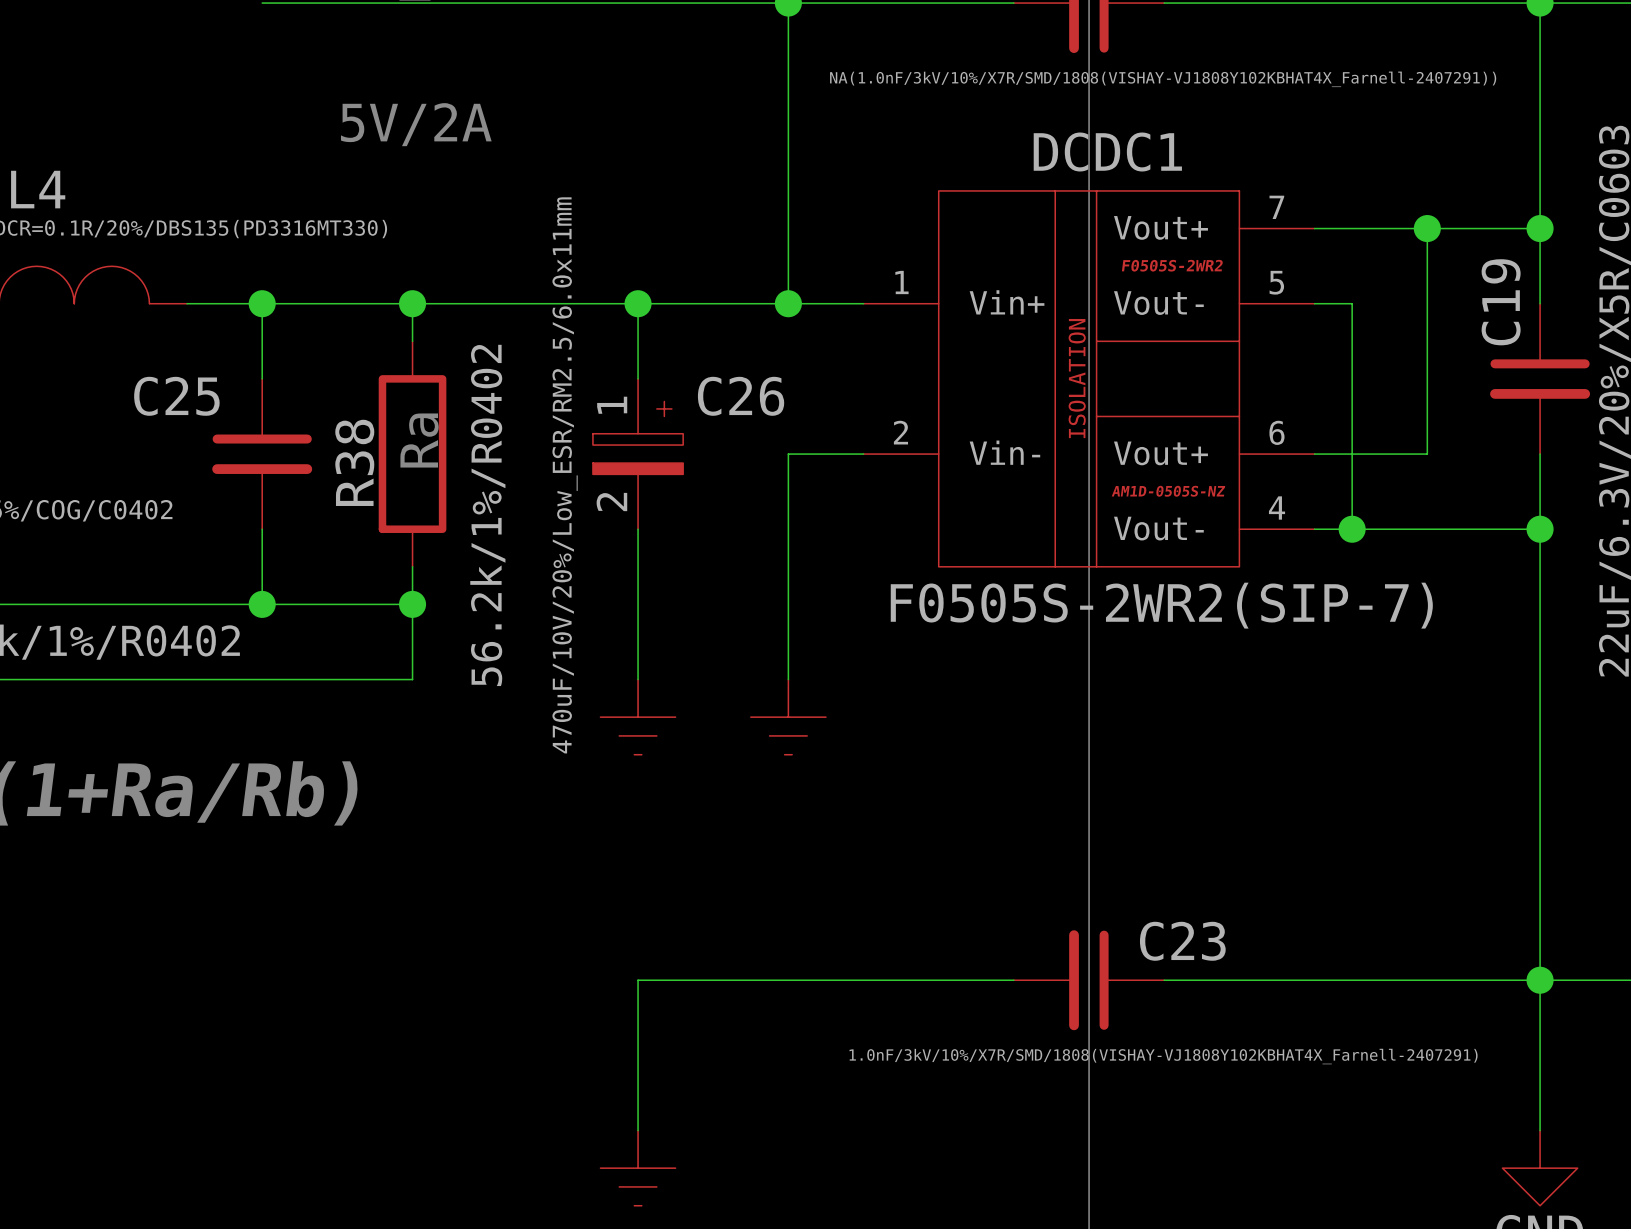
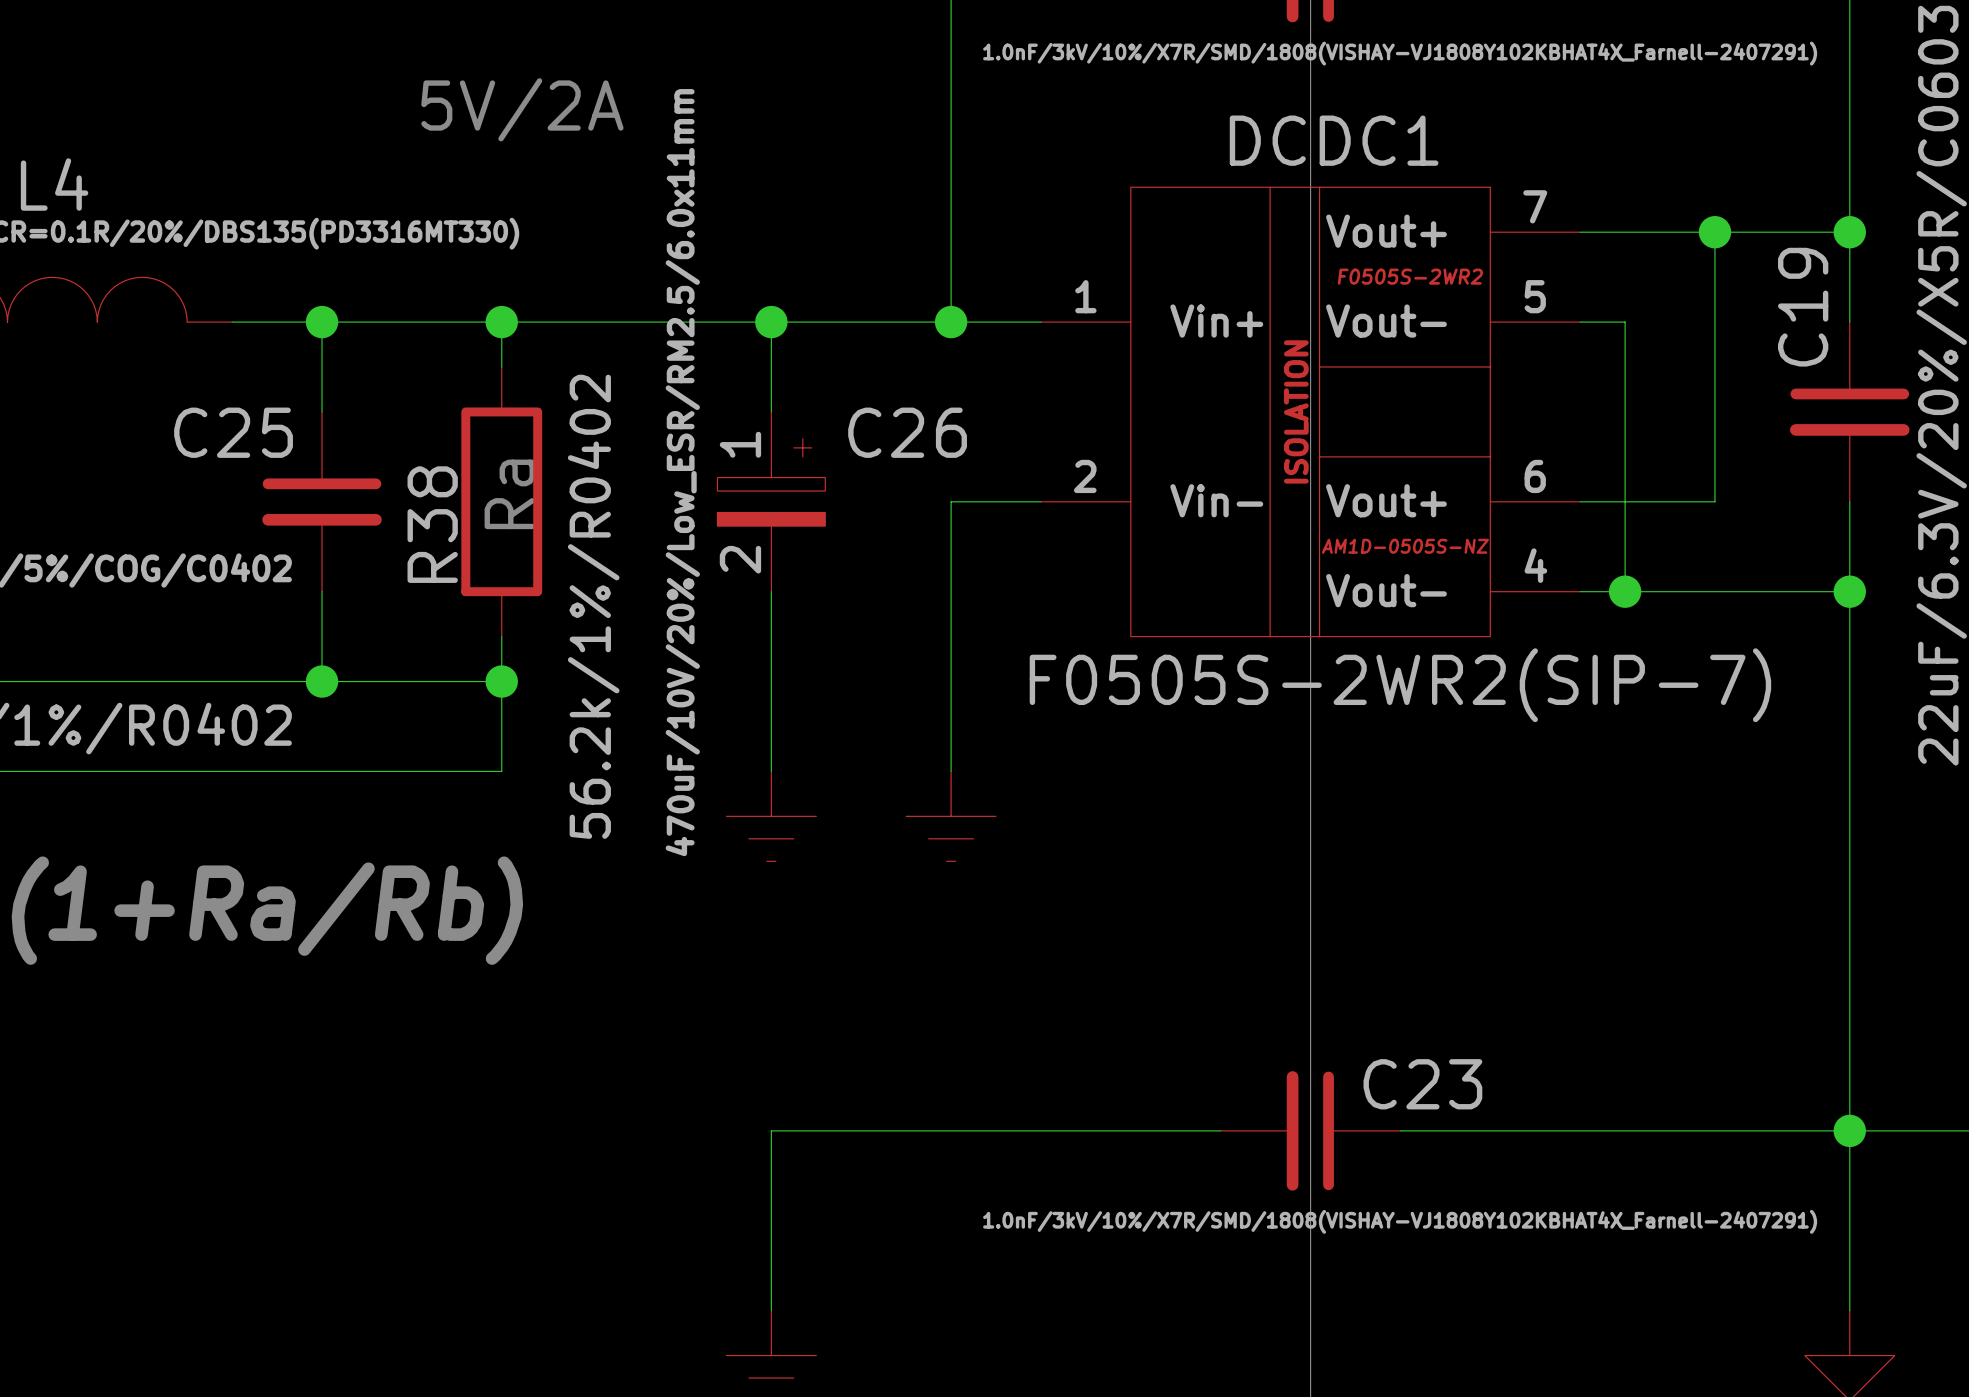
part value: NA(1.0nF/3kV/10%/X7R/SMD/1808(VISHAY-VJ1808Y102KBHAT4X_Farnell-2407291)) (1163, 79) -> 1.0nF/3kV/10%/X7R/SMD/1808(VISHAY-VJ1808Y102KBHAT4X_Farnell-2407291) (1400, 53)

